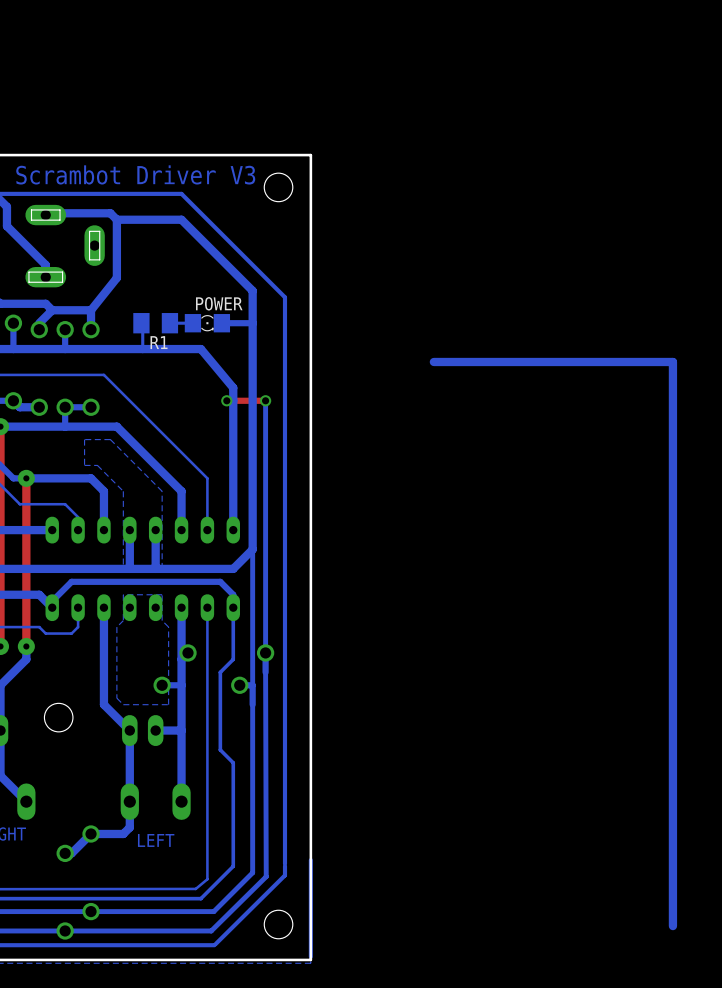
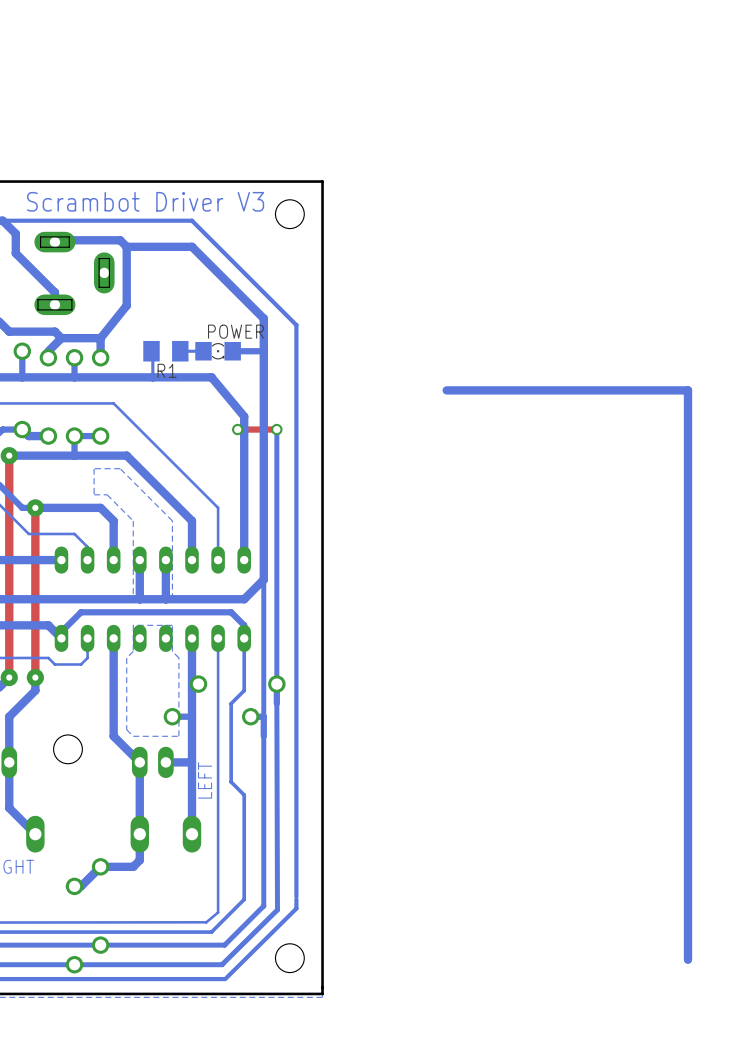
text rotation: 0° (156, 840) -> 90° counterclockwise (205, 780)
text position: LEFT (156, 840) -> LEFT (205, 780)
bottom track: (310, 860) (310, 956) -> none

